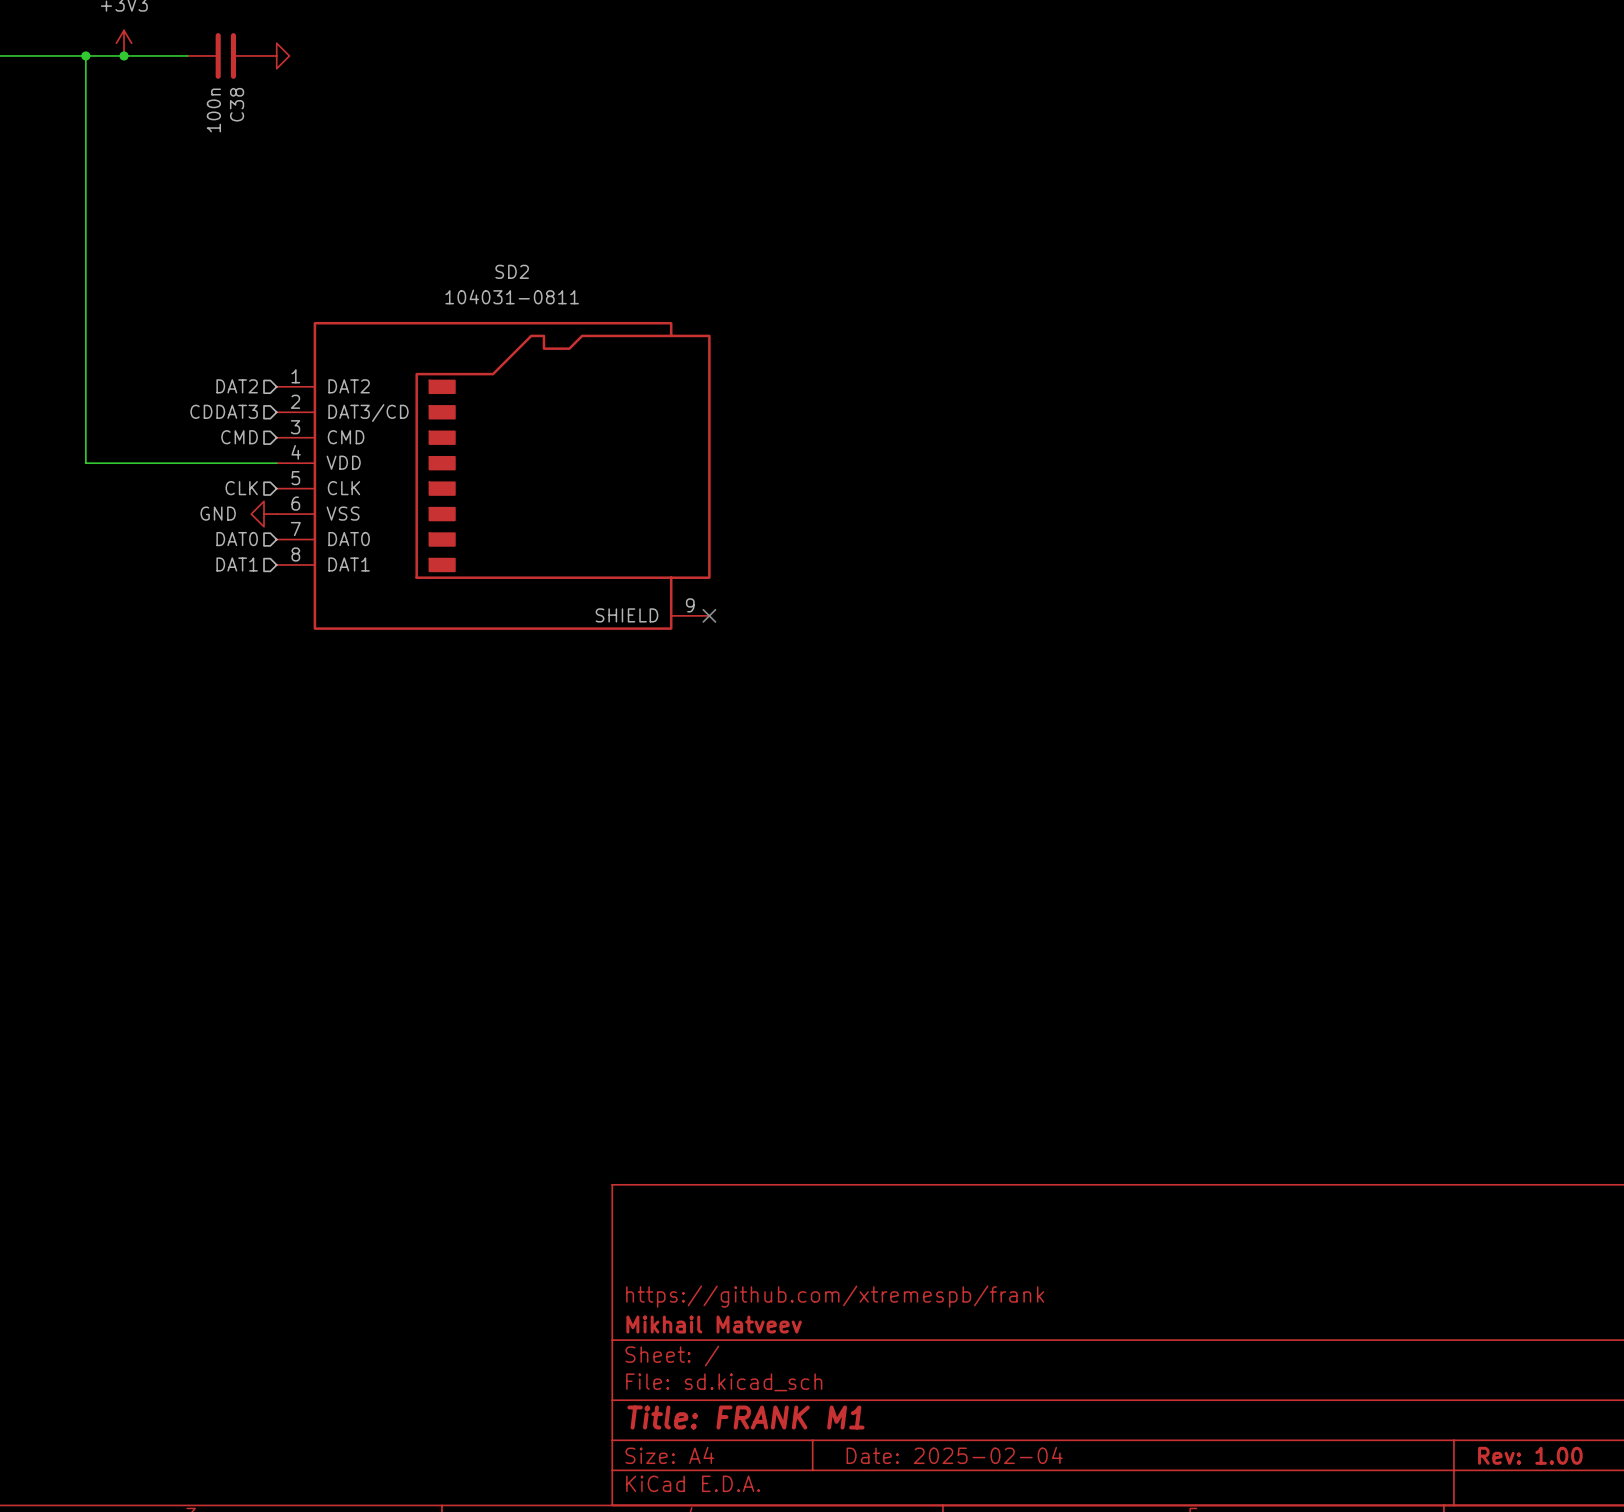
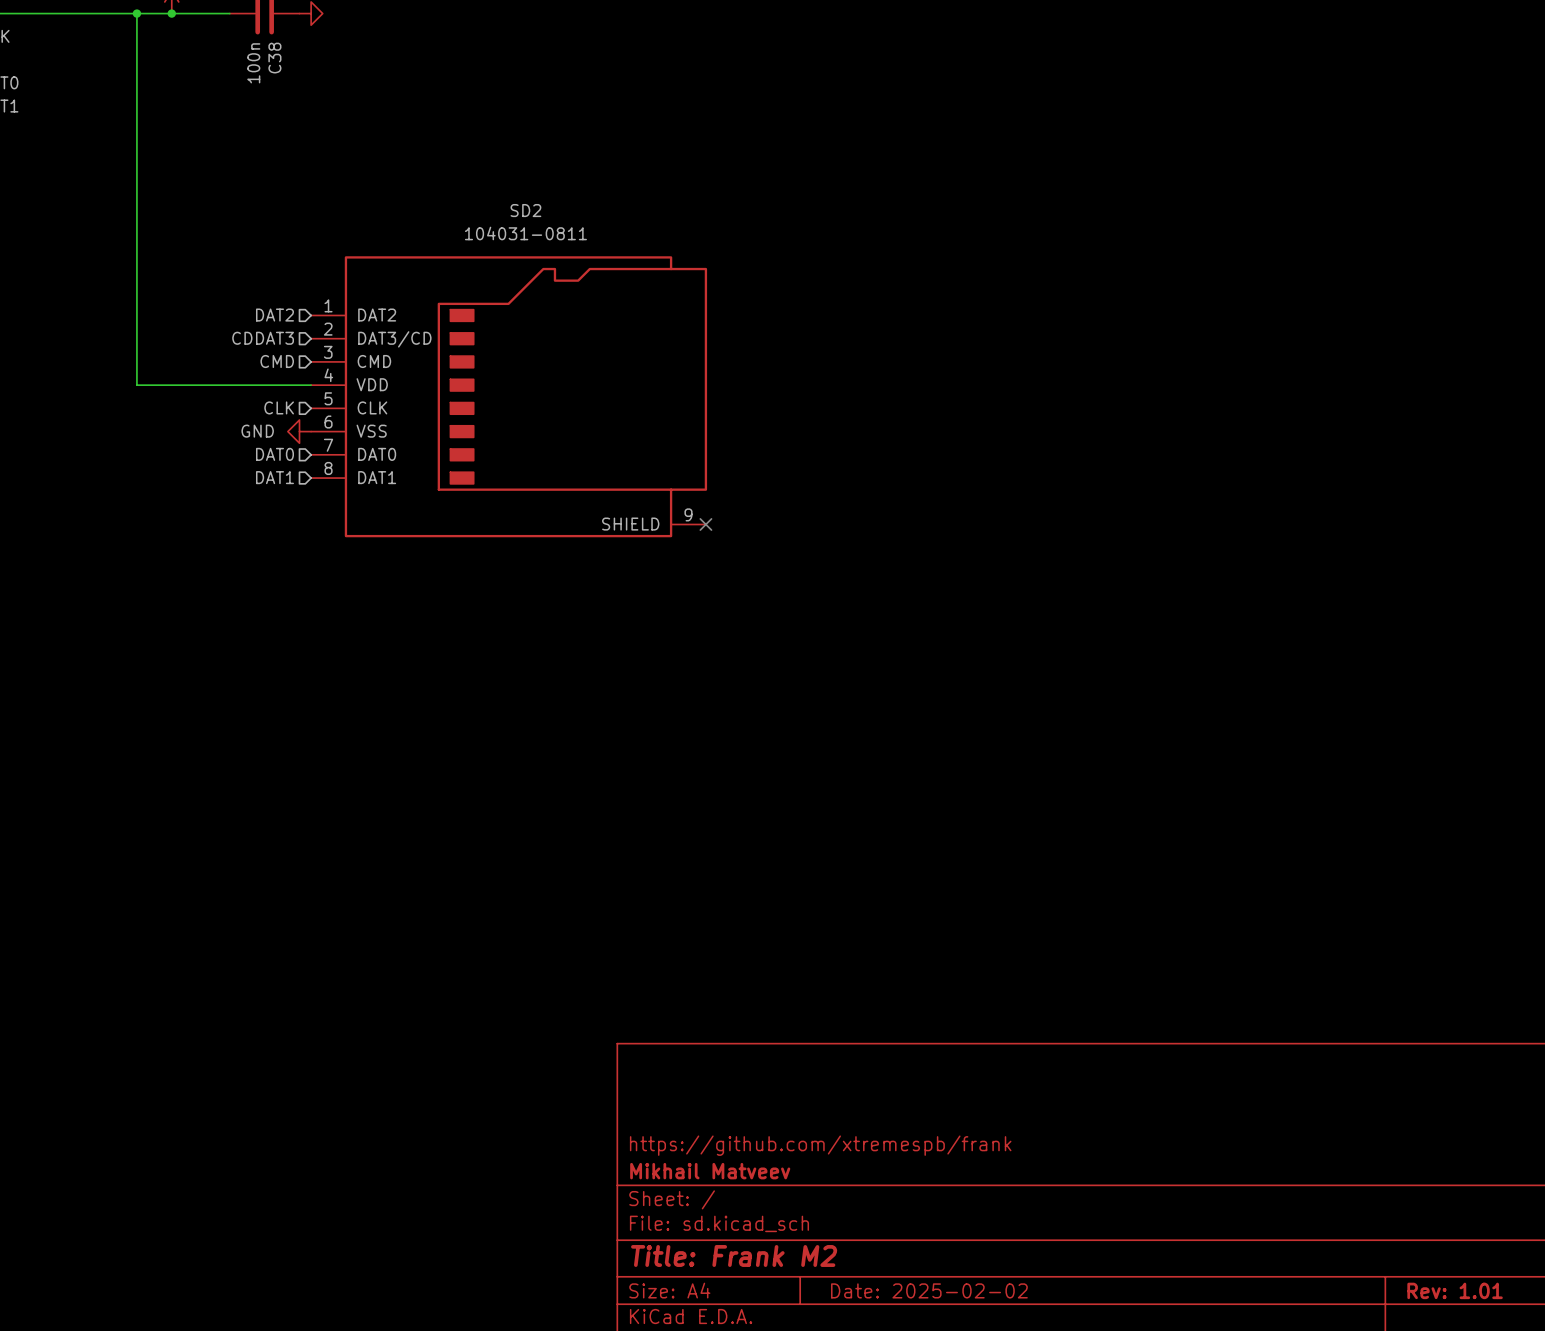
title block: Title: FRANK M1 (745, 1417) -> Title: Frank M2 (734, 1255)
title block: Date: 2025-02-04 (954, 1455) -> Date: 2025-02-02 (929, 1290)
title block: Rev: 1.00 (1530, 1455) -> Rev: 1.01 (1455, 1290)

